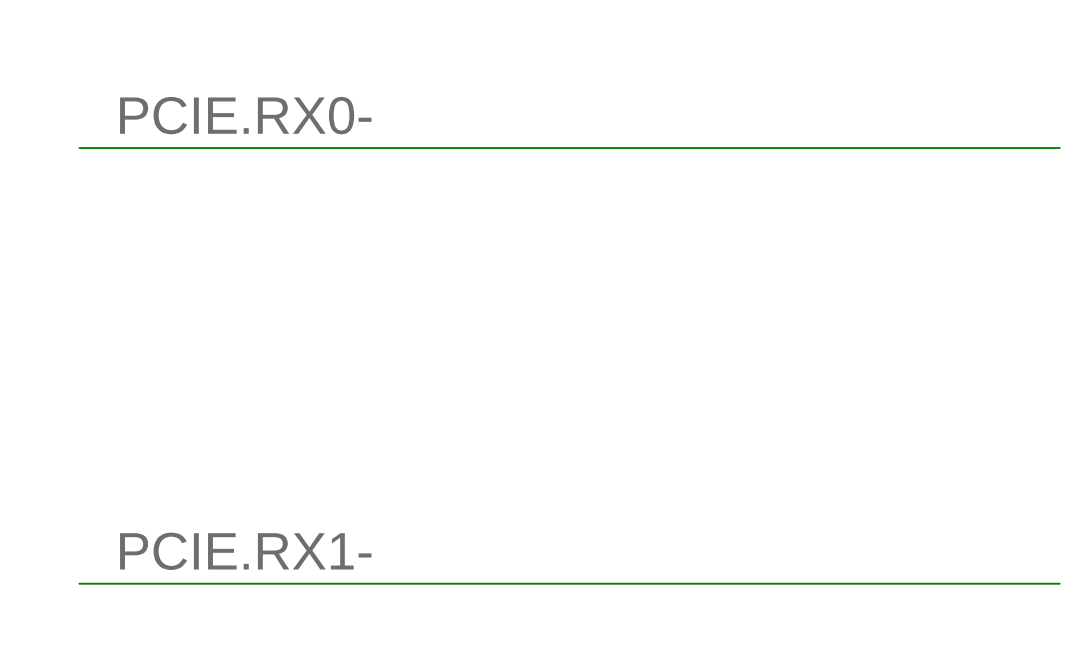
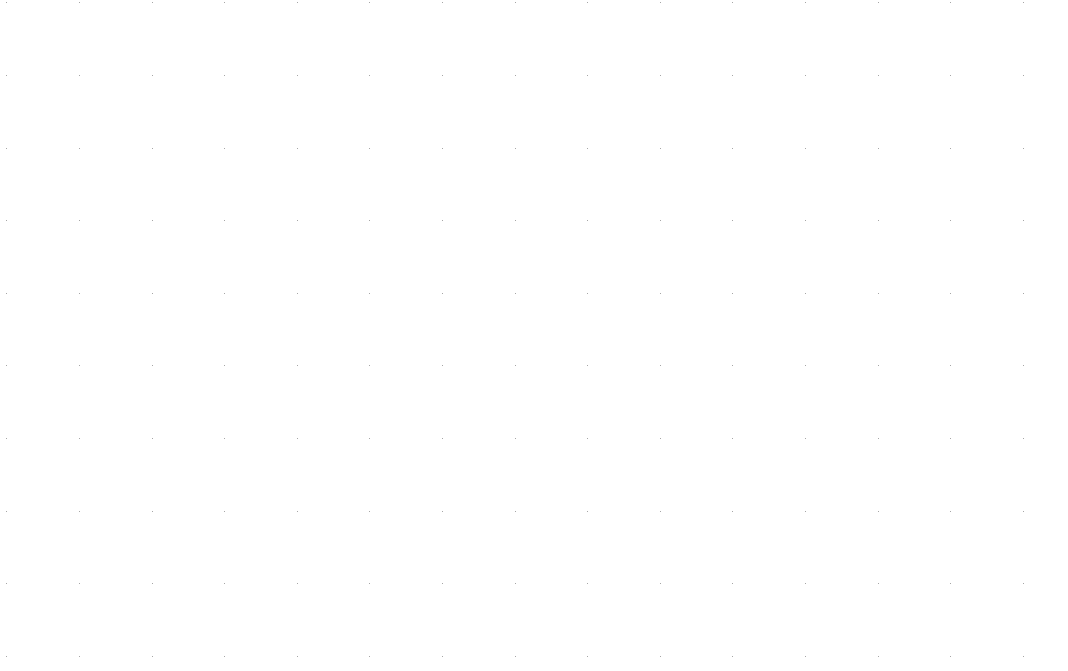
label: PCIE.RX0- (245, 115) -> none
wire: (79, 148) (1059, 148) -> none
label: PCIE.RX1- (245, 551) -> none
wire: (79, 583) (1059, 583) -> none

